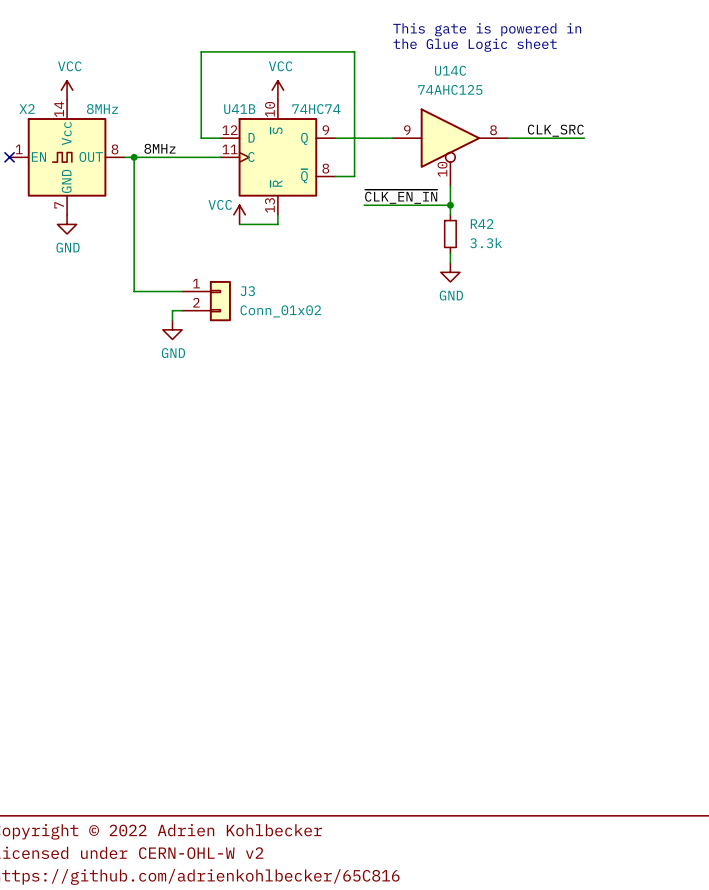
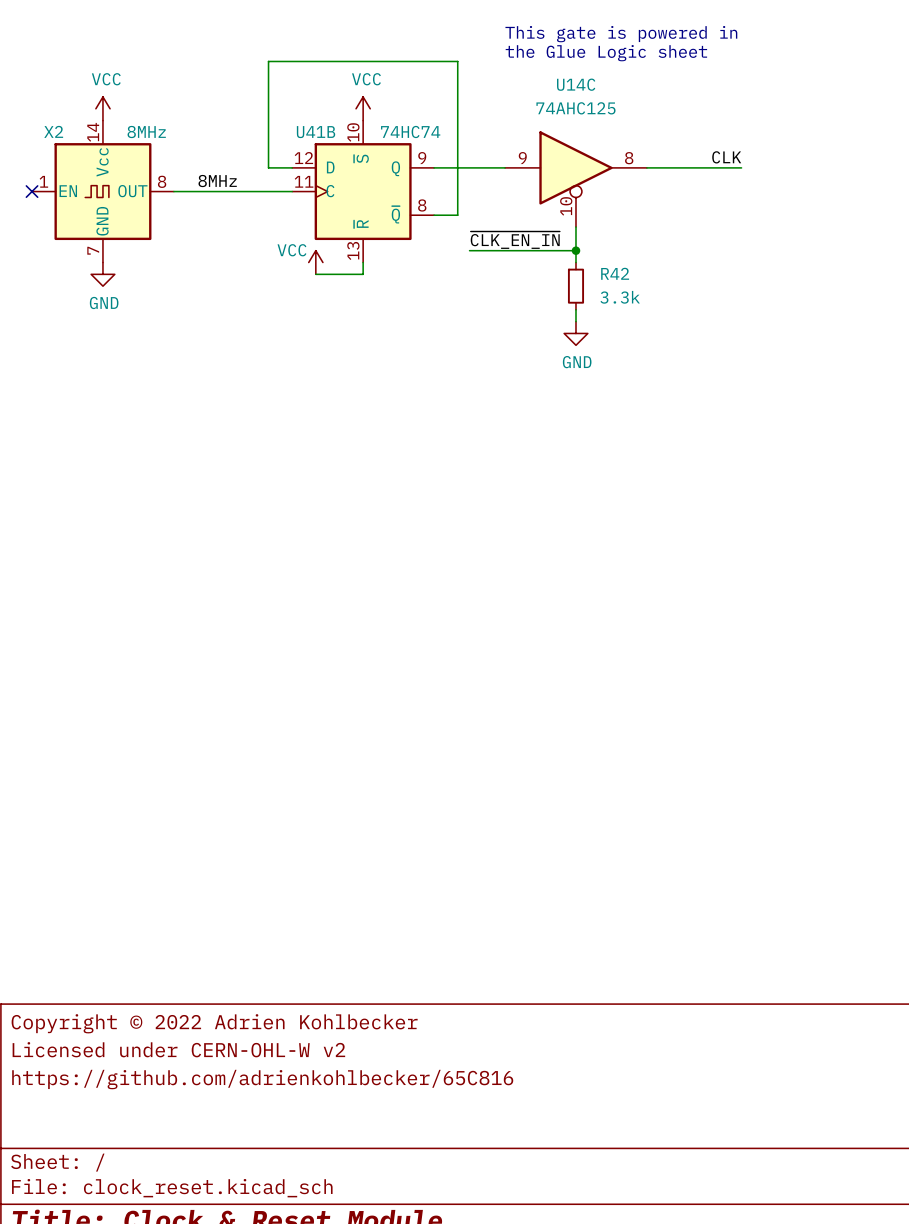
label: CLK_SRC (555, 130) -> CLK (726, 157)
wire: (134, 157) (134, 291) (182, 291) -> none
junction: (134, 157) -> none
J3: Conn_01x02 (206, 301) -> none
wire: (182, 310) (172, 310) (172, 320) -> none
power symbol: GND (172, 329) -> none

